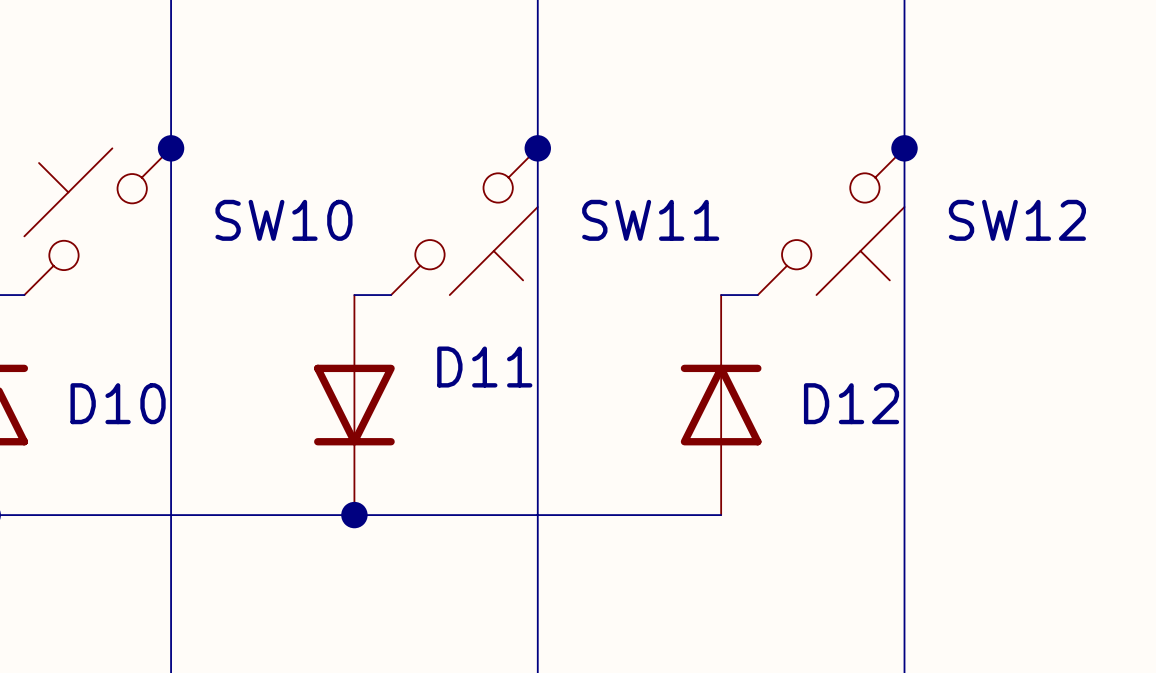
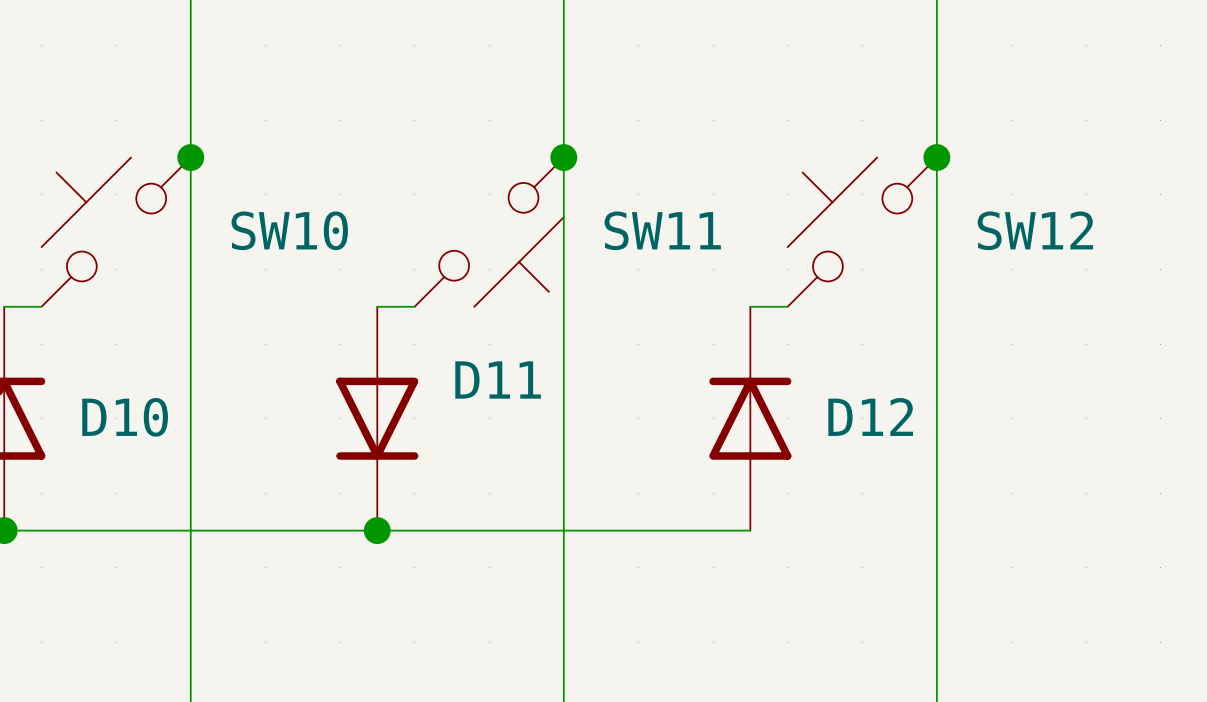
SW12 rotation: 0° (831, 221) -> 180° (862, 232)

